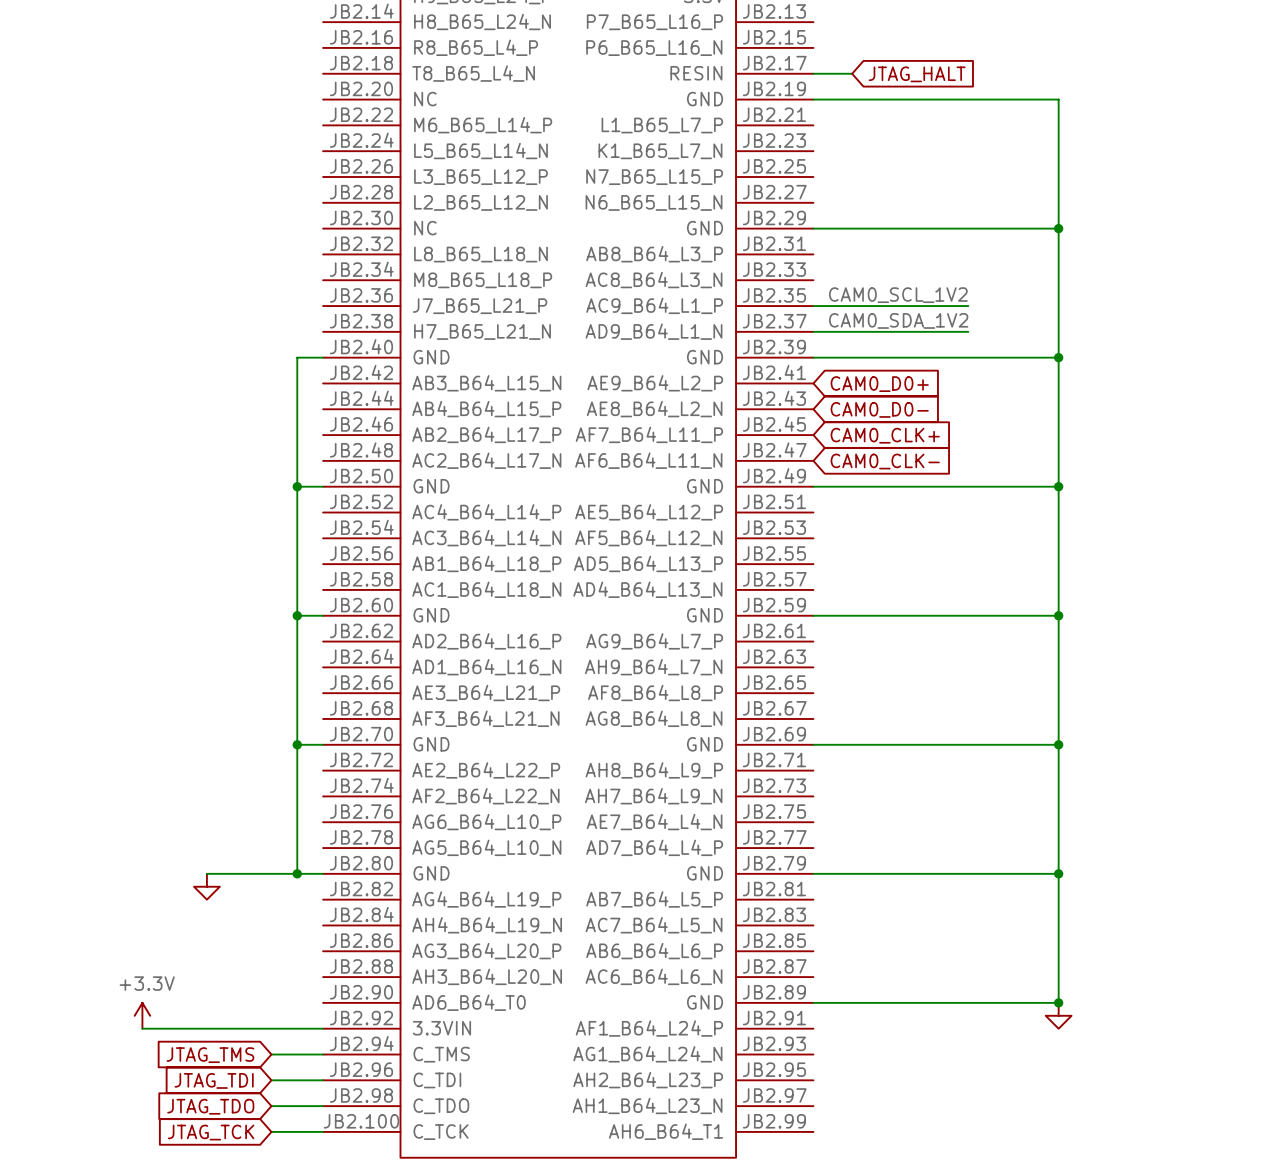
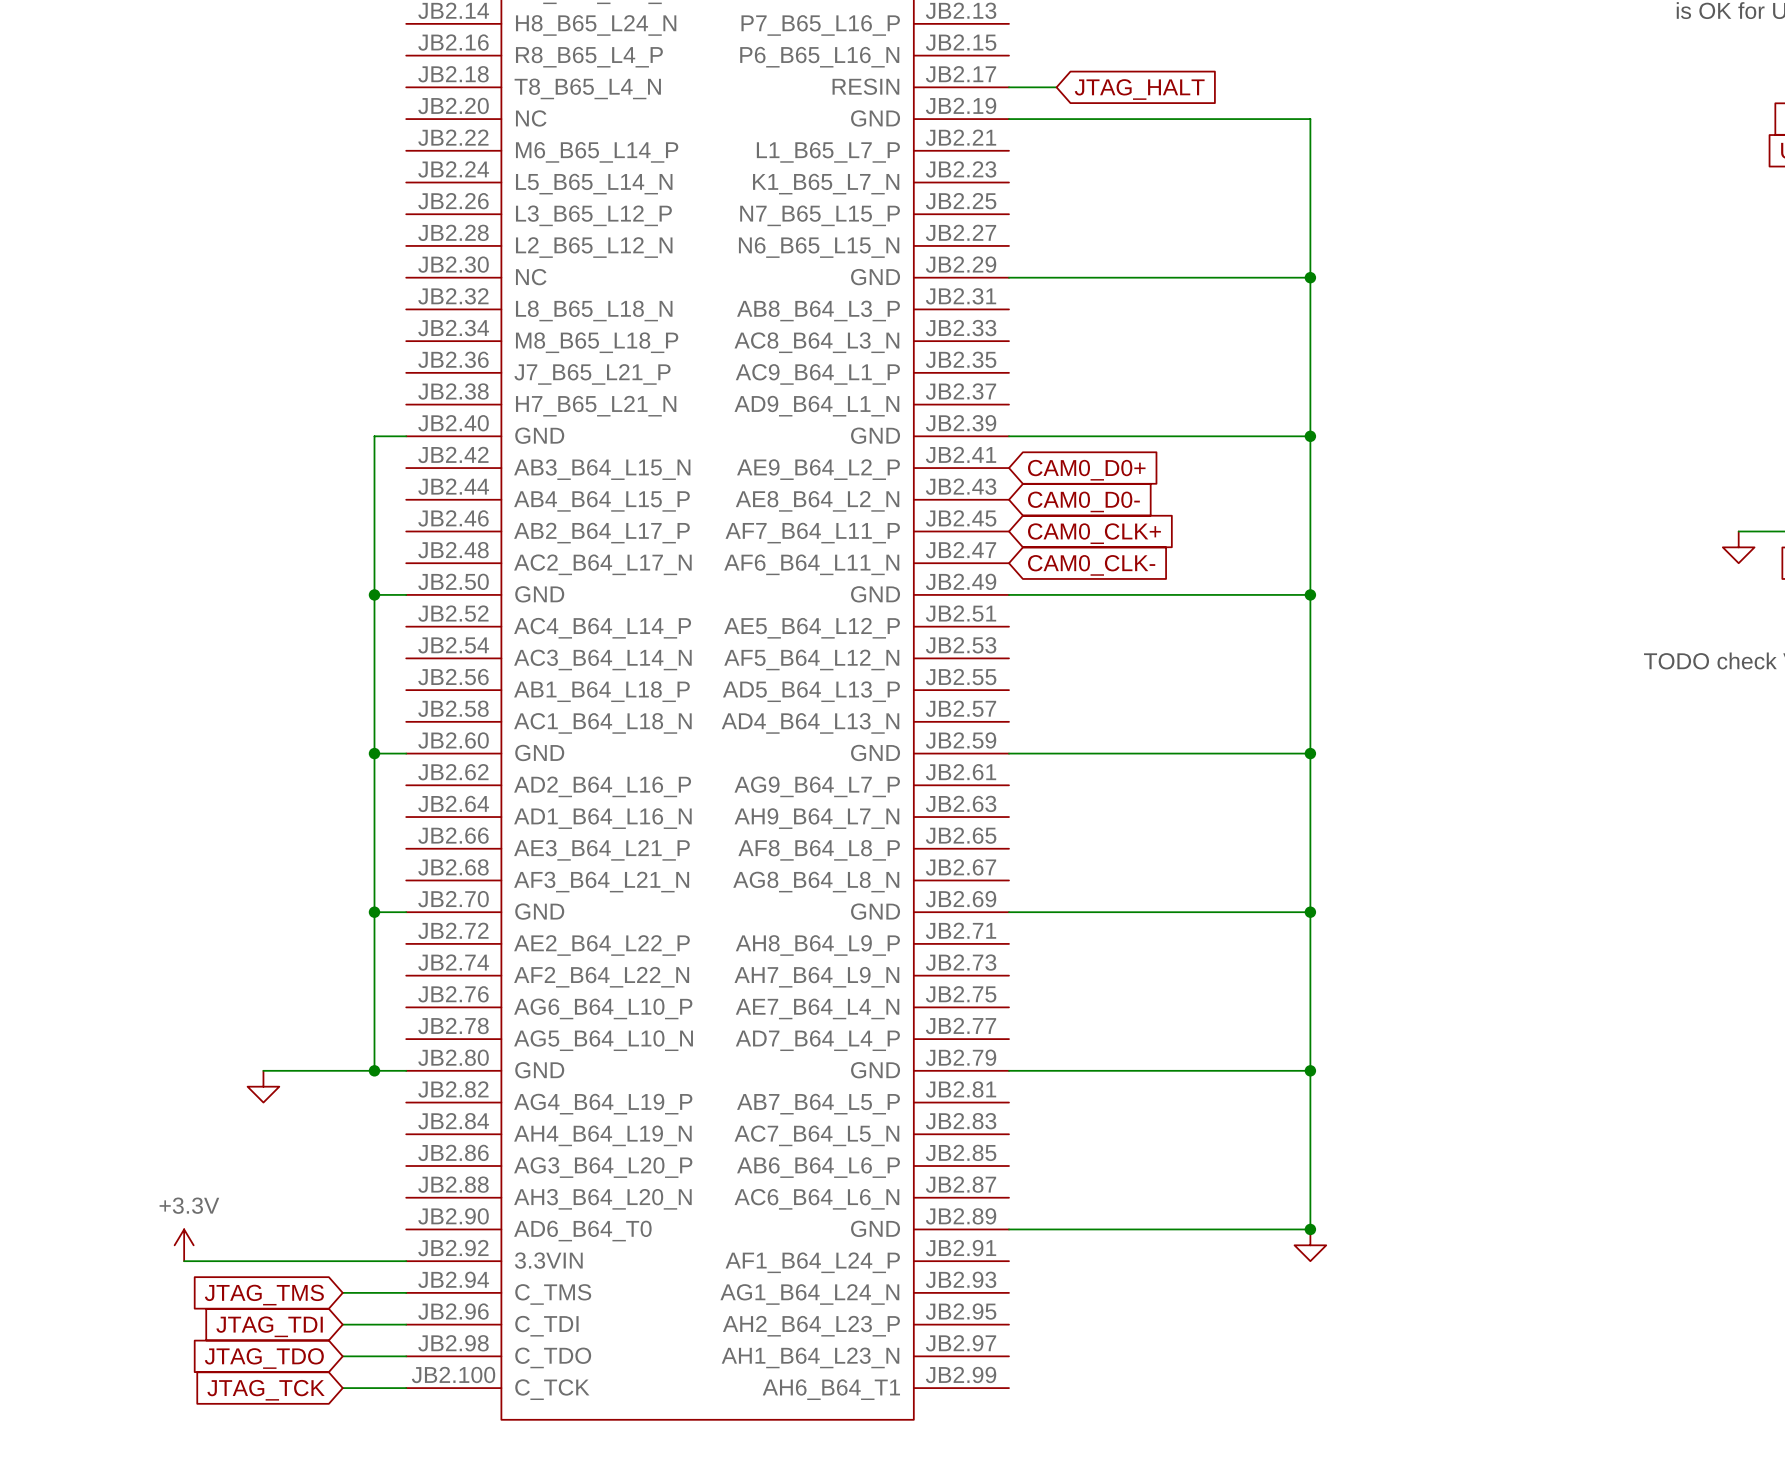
label: CAM0_SCL_1V2 (898, 295) -> none
wire: (813, 306) (968, 306) -> none
label: CAM0_SDA_1V2 (898, 320) -> none
wire: (813, 331) (968, 331) -> none

